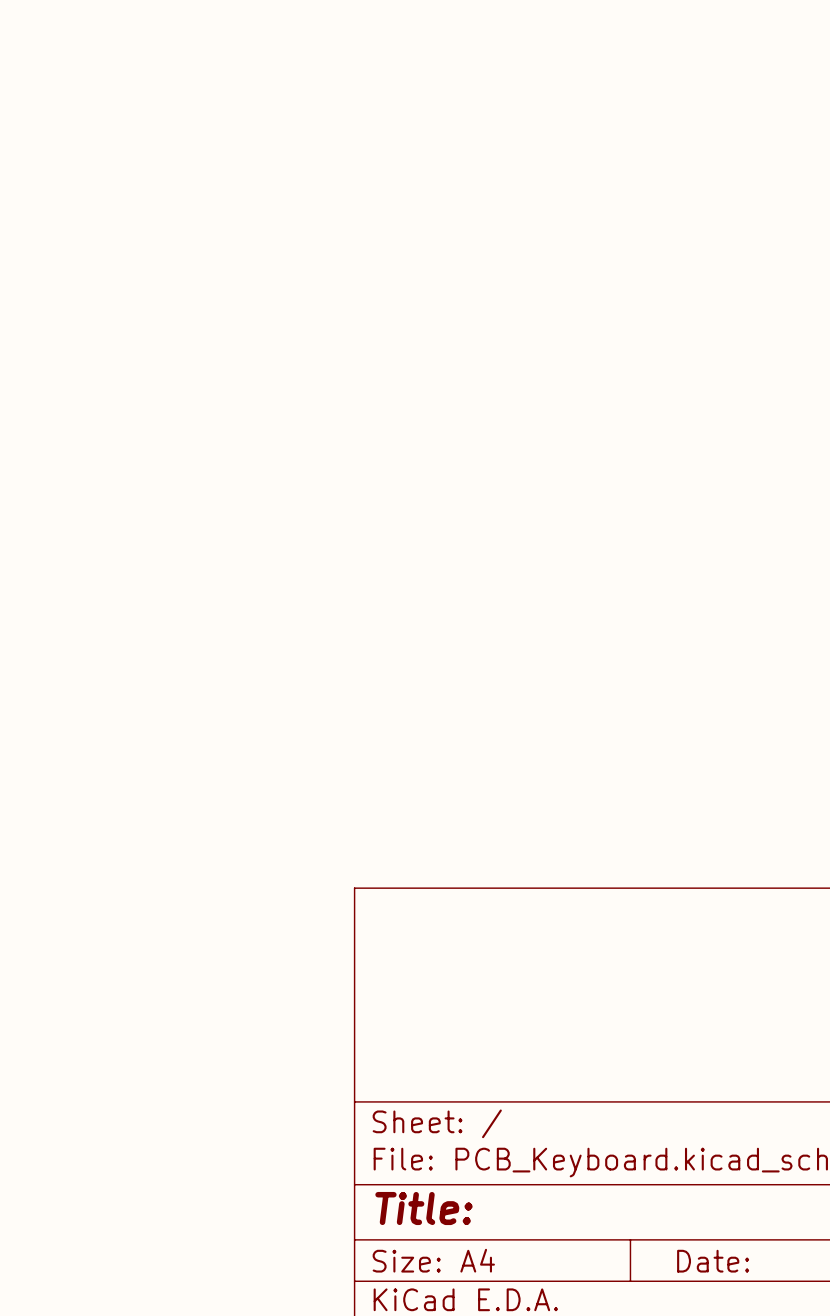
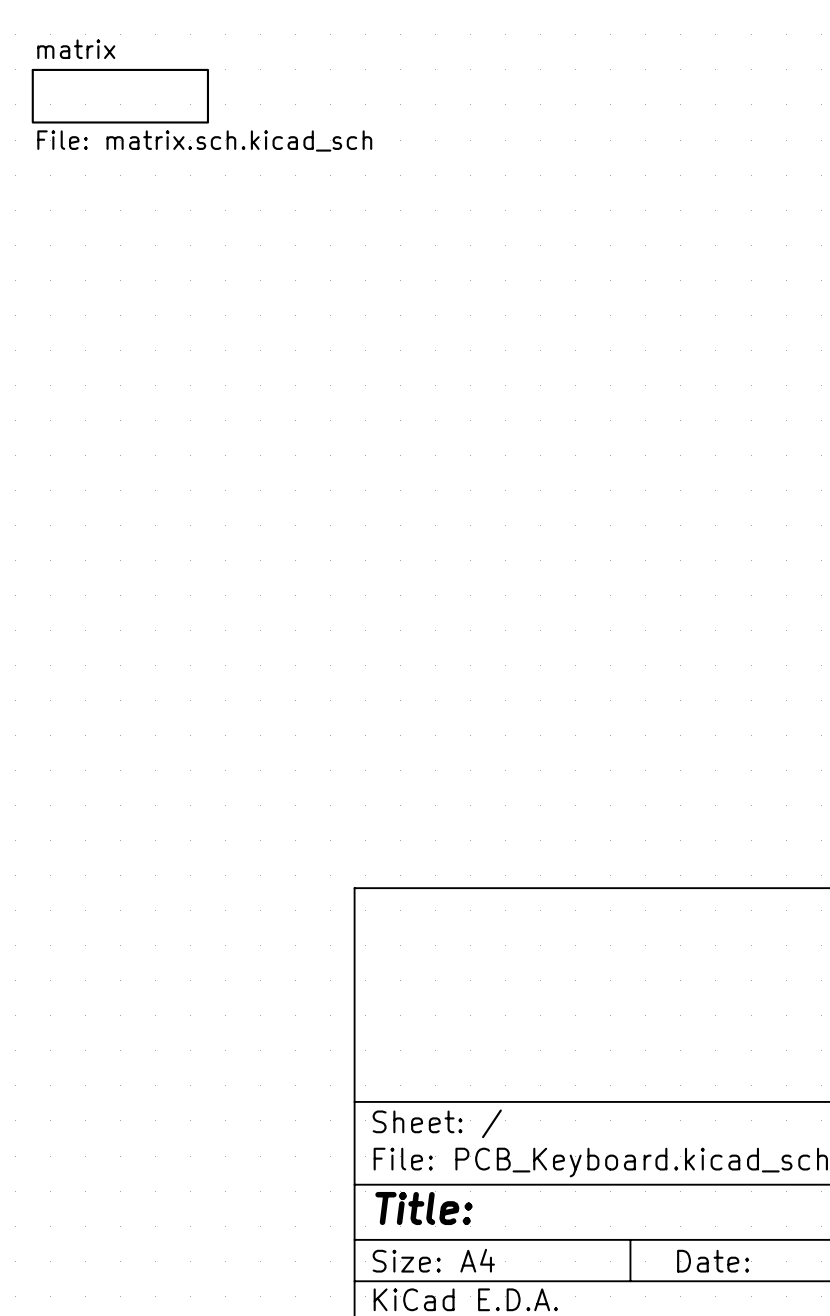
sheet matrix: none -> File: matrix.sch.kicad_sch (120, 96)

